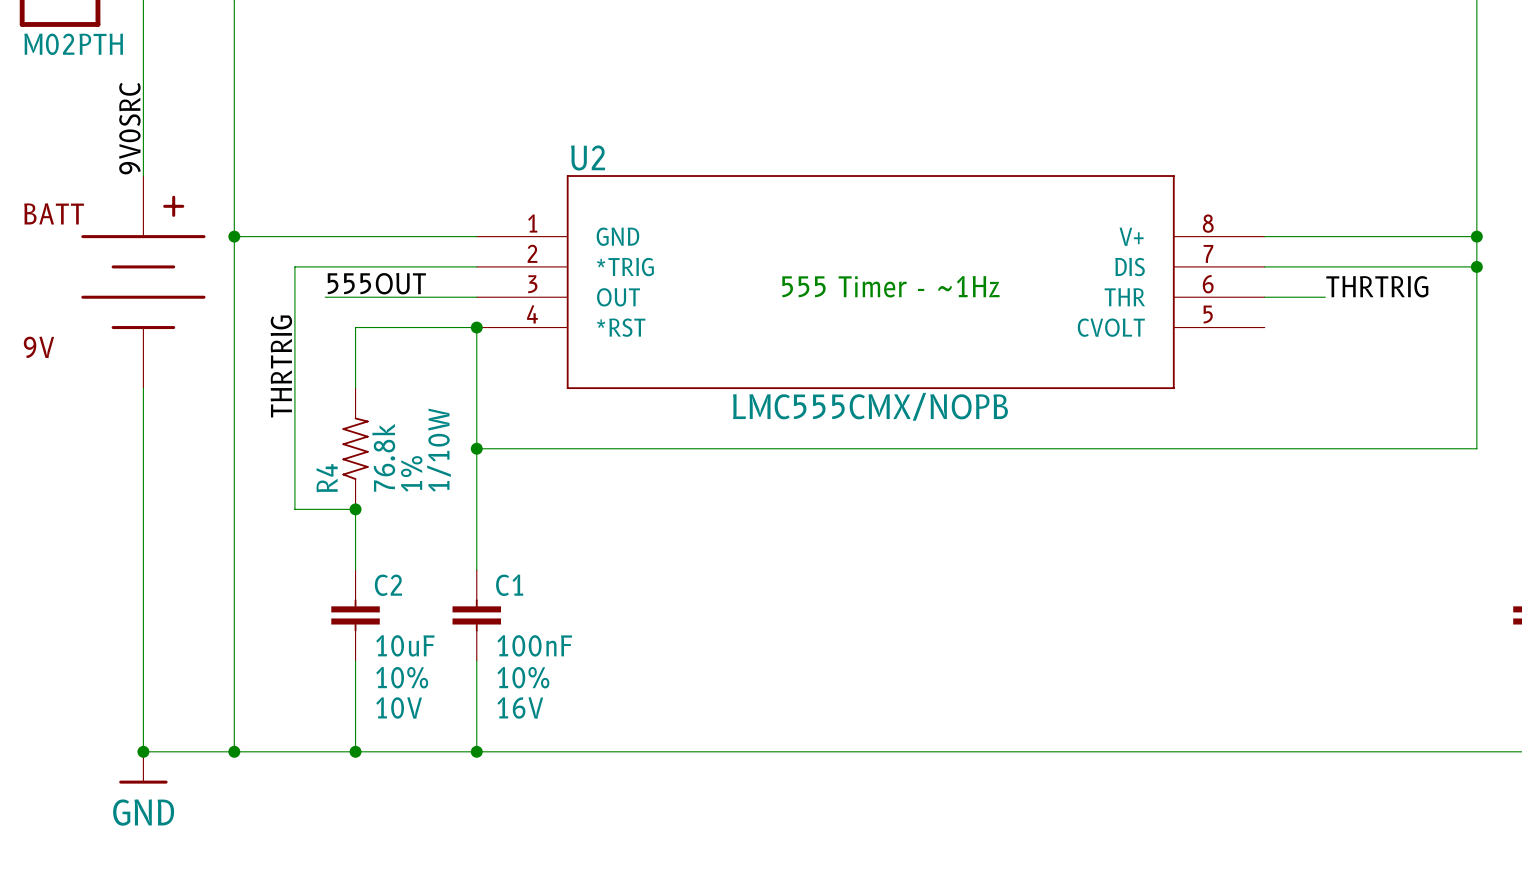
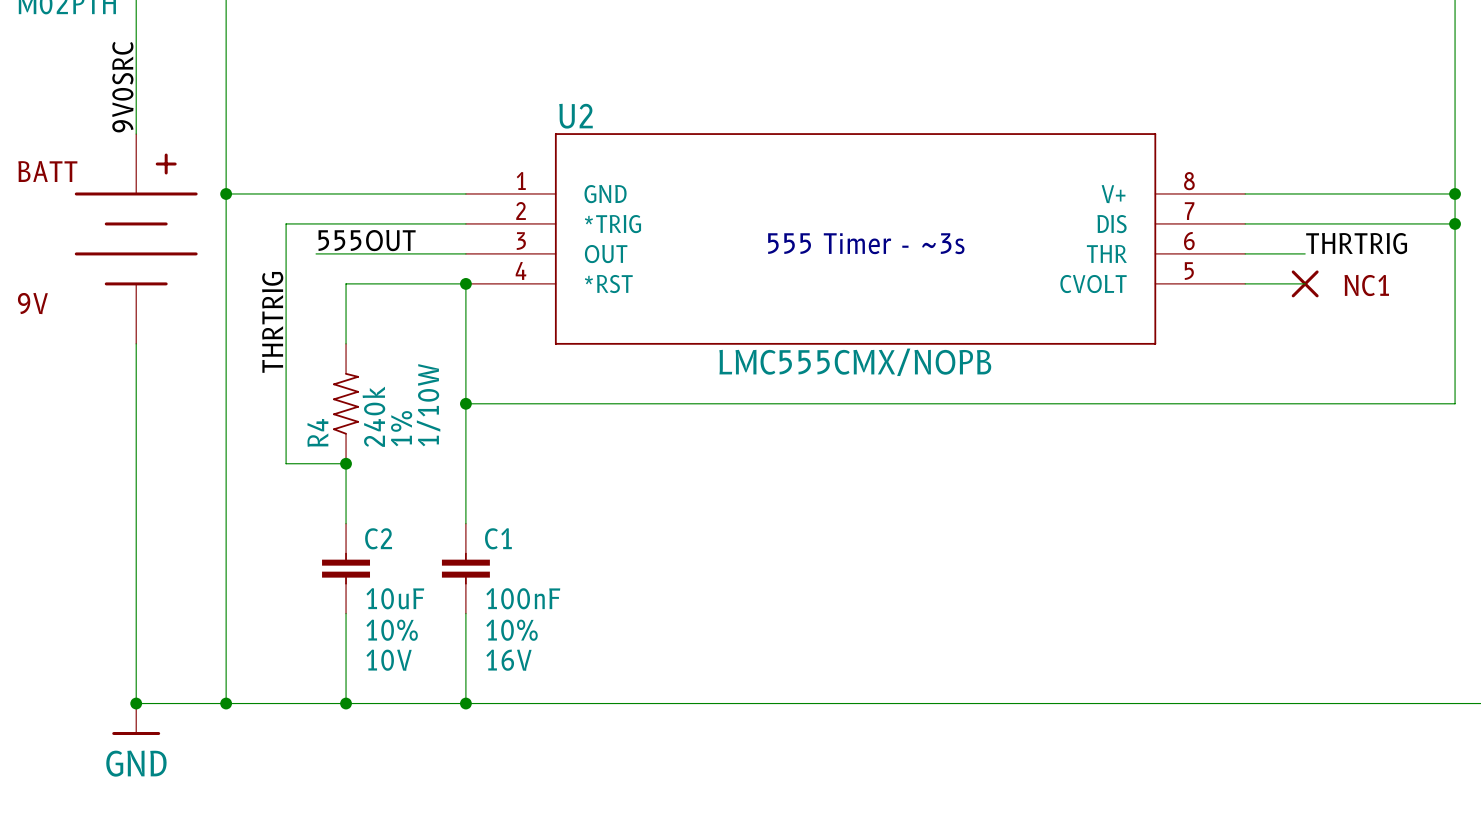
text: 555 Timer - ~1Hz (890, 286) -> 555 Timer - ~3s (866, 243)
wire: none -> (1245, 283) (1305, 283)
NC1: none -> (1305, 283)
R4 value: 76.8k (383, 457) -> 240k (373, 416)

